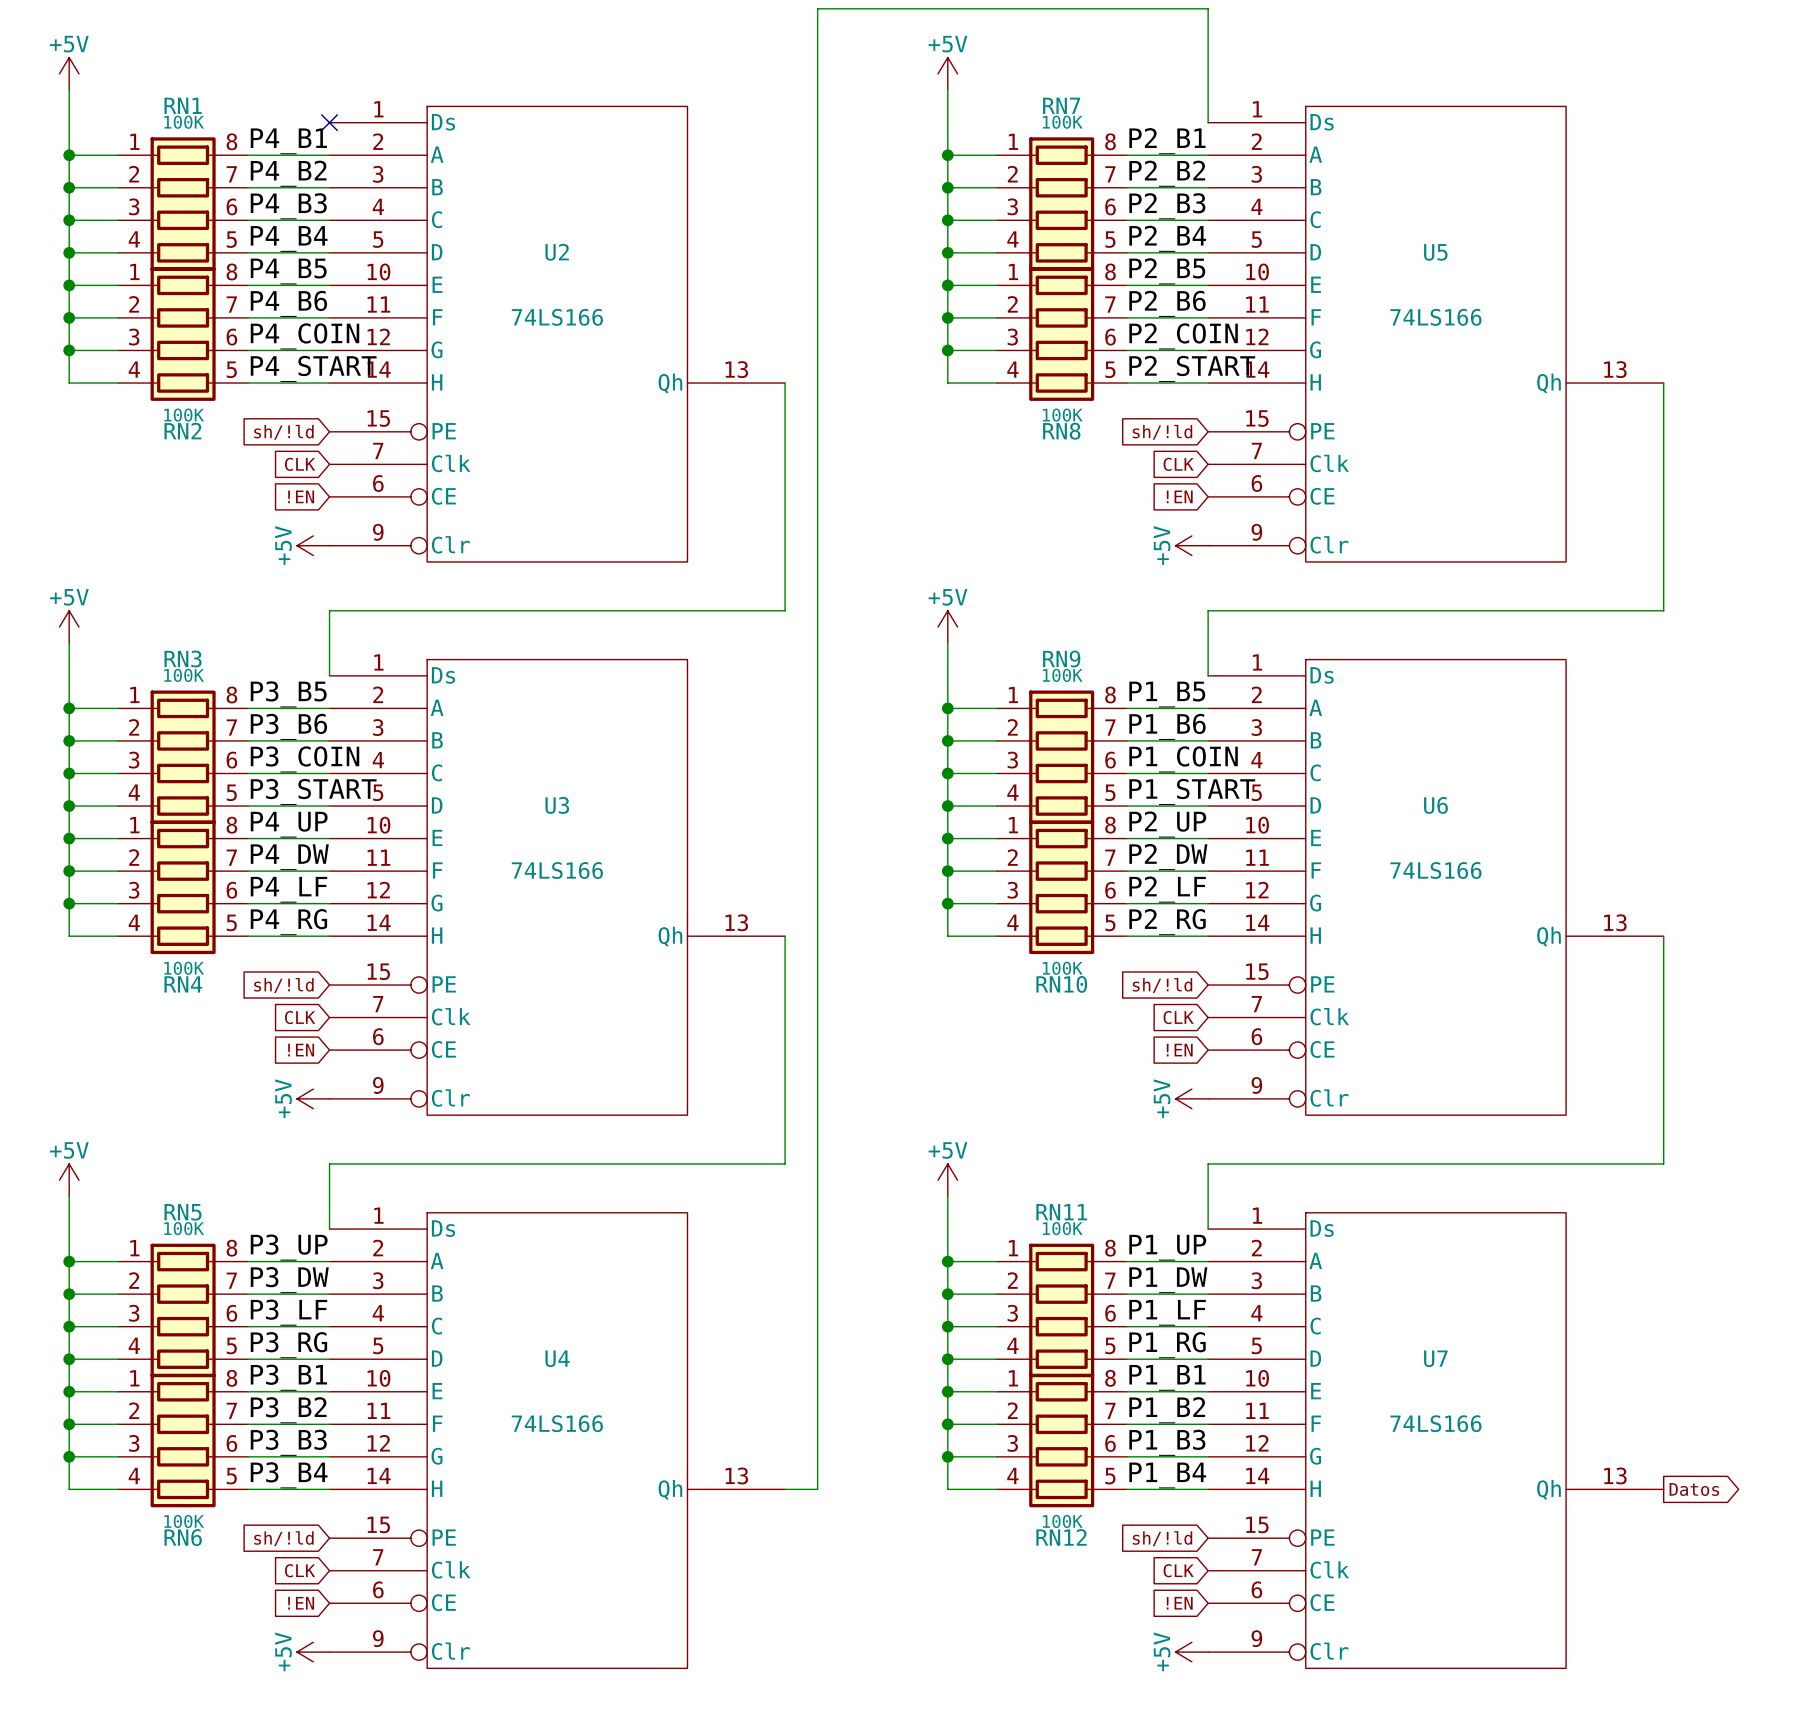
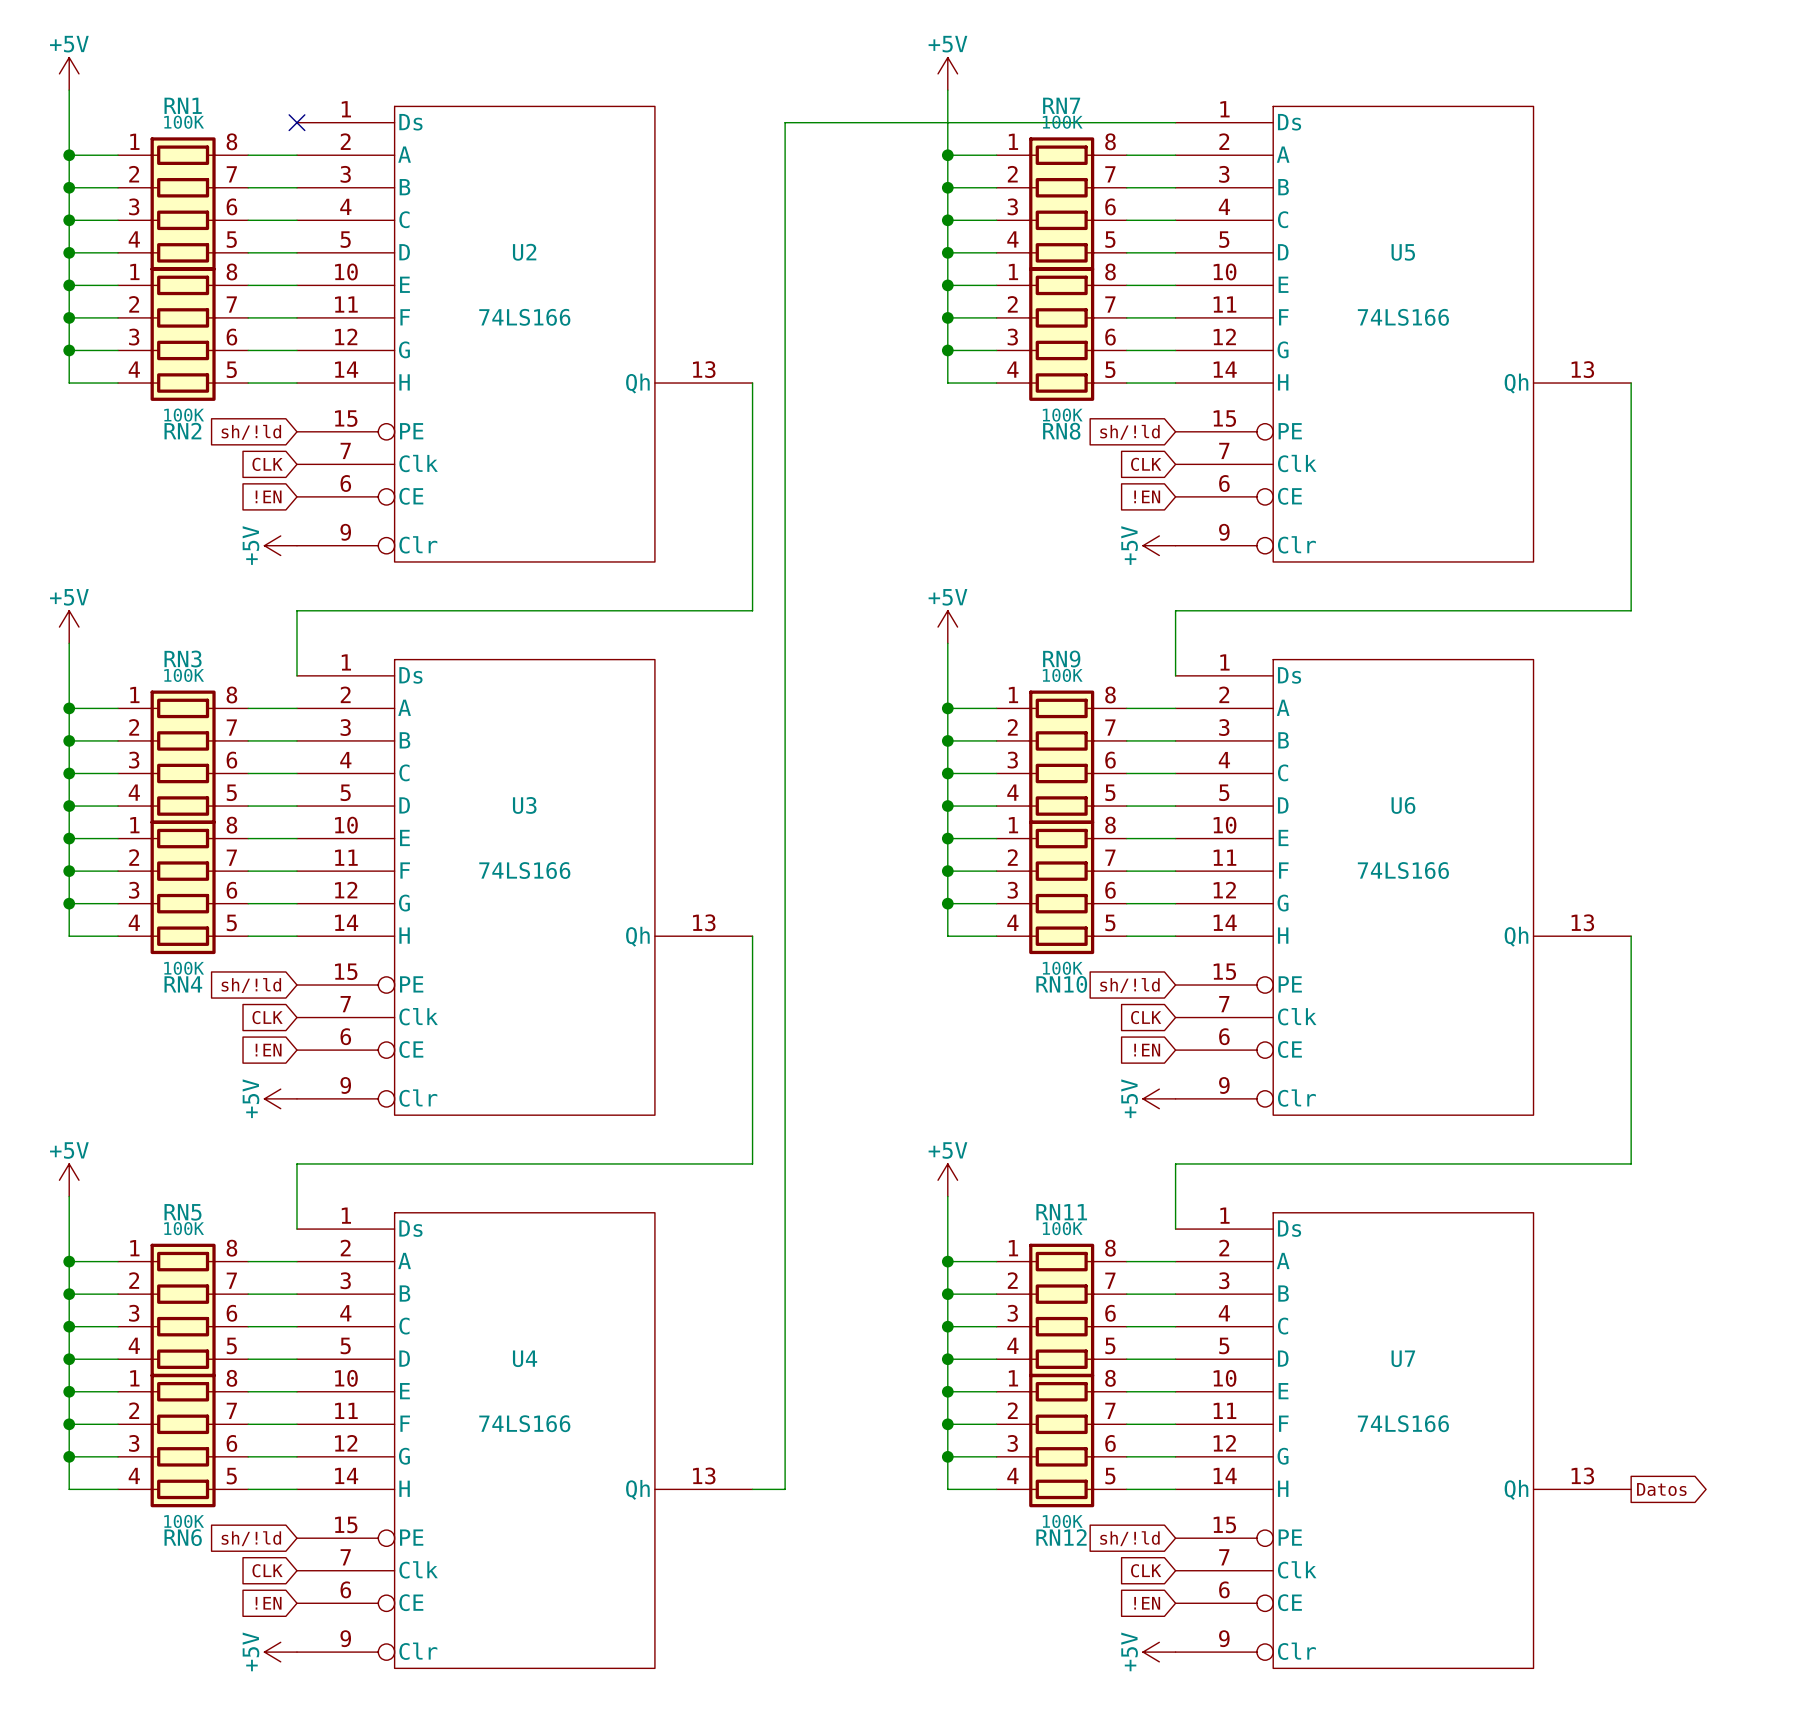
no-connect mark position: (329, 122) -> (296, 122)
wire: none -> (1175, 122) (785, 122) (785, 383)
wire: (1208, 122) (1208, 8) (817, 8) (817, 1489) (785, 1489) -> none
label: P4_B1 (288, 141) -> none
label: P2_B1 (1167, 141) -> none
label: P4_B2 (288, 173) -> none
label: P2_B2 (1167, 173) -> none
label: P4_B3 (288, 206) -> none
label: P2_B3 (1167, 206) -> none
label: P4_B4 (289, 238) -> none
label: P2_B4 (1167, 238) -> none
label: P4_B5 (288, 271) -> none
label: P2_B5 (1167, 271) -> none
label: P4_B6 (288, 303) -> none
label: P2_B6 (1167, 303) -> none
U2 position: (557, 334) -> (524, 334)
U5 position: (1435, 334) -> (1403, 334)
label: P4_COIN (304, 336) -> none
label: P2_COIN (1183, 336) -> none
label: P4_START (313, 368) -> none
label: P2_START (1192, 368) -> none
wire: (1663, 383) (1663, 610) (1631, 610) -> (1631, 383) (1631, 610)
global label position: sh/!ld (283, 432) -> sh/!ld (251, 432)
global label position: sh/!ld (1162, 432) -> sh/!ld (1129, 432)
global label position: CLK (300, 464) -> CLK (267, 464)
global label position: CLK (1178, 464) -> CLK (1146, 464)
global label position: !EN (301, 496) -> !EN (268, 496)
global label position: !EN (1179, 496) -> !EN (1147, 496)
power symbol position: +5V (313, 545) -> +5V (280, 545)
power symbol position: +5V (1191, 545) -> +5V (1159, 545)
wire: (329, 610) (329, 675) -> (329, 610) (296, 610) (296, 675)
wire: (752, 610) (785, 610) -> (752, 610) (752, 383)
wire: none -> (785, 610) (785, 936)
wire: (1208, 610) (1208, 675) -> (1208, 610) (1175, 610) (1175, 675)
label: P3_B5 (288, 694) -> none
label: P1_B5 (1167, 694) -> none
label: P3_B6 (288, 726) -> none
label: P1_B6 (1167, 726) -> none
label: P3_COIN (304, 759) -> none
label: P1_COIN (1183, 759) -> none
label: P3_START (313, 791) -> none
label: P1_START (1192, 791) -> none
label: P4_UP (289, 824) -> none
label: P2_UP (1167, 824) -> none
label: P4_DW (289, 857) -> none
label: P2_DW (1168, 857) -> none
U3 position: (557, 887) -> (524, 887)
U6 position: (1435, 887) -> (1403, 887)
label: P4_LF (288, 889) -> none
label: P2_LF (1167, 889) -> none
label: P4_RG (288, 922) -> none
label: P2_RG (1167, 922) -> none
wire: (1663, 936) (1663, 1163) (1631, 1163) -> (1631, 936) (1631, 1163)
global label position: sh/!ld (283, 985) -> sh/!ld (251, 985)
global label position: sh/!ld (1162, 985) -> sh/!ld (1129, 985)
global label position: CLK (300, 1017) -> CLK (267, 1017)
global label position: CLK (1178, 1017) -> CLK (1146, 1017)
global label position: !EN (301, 1050) -> !EN (268, 1050)
global label position: !EN (1179, 1050) -> !EN (1147, 1050)
power symbol position: +5V (313, 1098) -> +5V (280, 1098)
power symbol position: +5V (1191, 1098) -> +5V (1159, 1098)
wire: (329, 1163) (329, 1229) -> (329, 1163) (296, 1163) (296, 1229)
wire: (752, 1163) (785, 1163) -> (752, 1163) (752, 936)
wire: none -> (785, 1163) (785, 1489) (752, 1489)
wire: (1208, 1163) (1208, 1229) -> (1208, 1163) (1175, 1163) (1175, 1229)
label: P3_UP (289, 1247) -> none
label: P1_UP (1167, 1247) -> none
label: P3_DW (289, 1280) -> none
label: P1_DW (1168, 1280) -> none
label: P3_LF (288, 1312) -> none
label: P1_LF (1167, 1312) -> none
label: P3_RG (288, 1345) -> none
label: P1_RG (1167, 1345) -> none
label: P3_B1 (288, 1377) -> none
label: P1_B1 (1167, 1377) -> none
label: P3_B2 (288, 1410) -> none
label: P1_B2 (1167, 1410) -> none
U4 position: (557, 1440) -> (524, 1440)
U7 position: (1435, 1440) -> (1403, 1440)
label: P3_B3 (288, 1442) -> none
label: P1_B3 (1167, 1442) -> none
label: P3_B4 (289, 1475) -> none
label: P1_B4 (1167, 1475) -> none
global label position: Datos (1694, 1489) -> Datos (1661, 1489)
global label position: sh/!ld (283, 1538) -> sh/!ld (251, 1538)
global label position: sh/!ld (1162, 1538) -> sh/!ld (1129, 1538)
global label position: CLK (300, 1570) -> CLK (267, 1570)
global label position: CLK (1178, 1570) -> CLK (1146, 1570)
global label position: !EN (301, 1603) -> !EN (268, 1603)
global label position: !EN (1179, 1603) -> !EN (1147, 1603)
power symbol position: +5V (313, 1652) -> +5V (280, 1652)
power symbol position: +5V (1191, 1652) -> +5V (1159, 1652)

